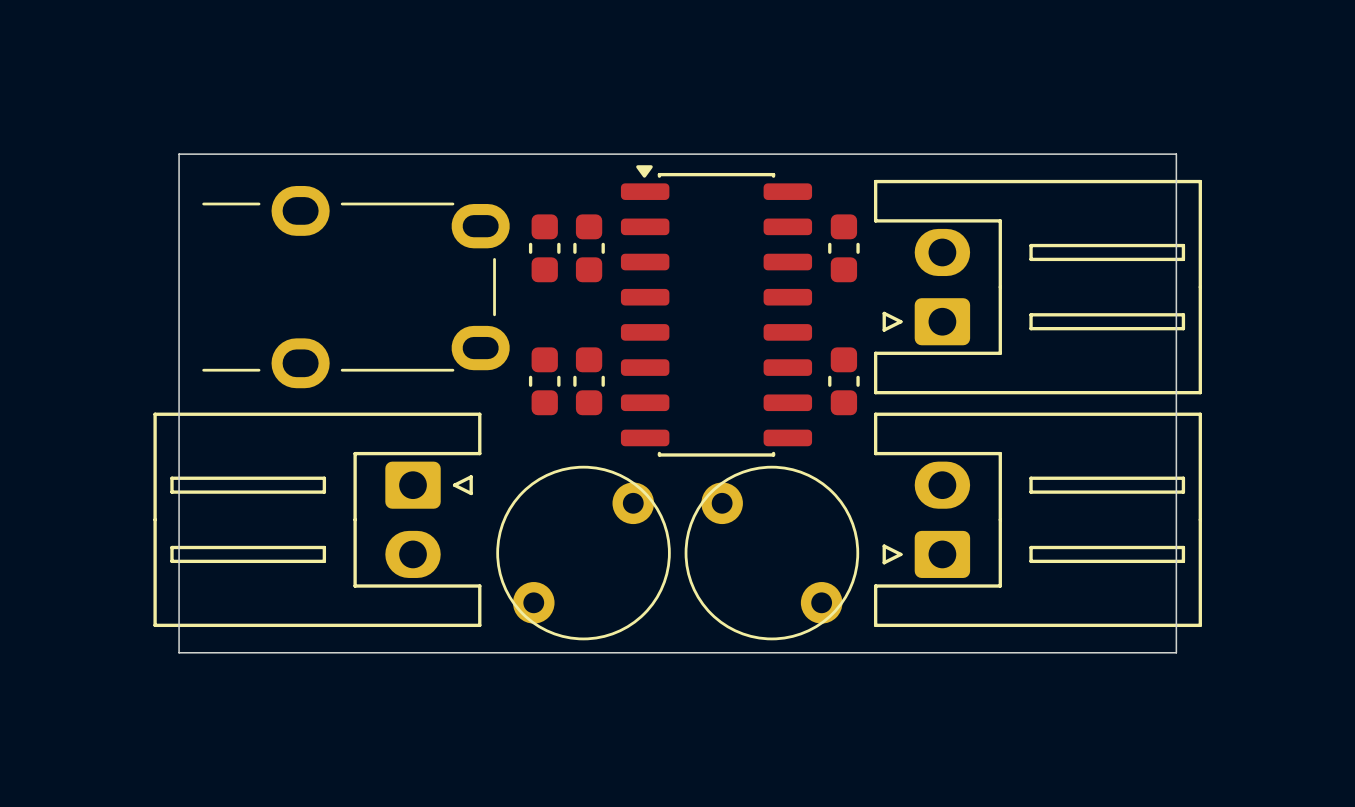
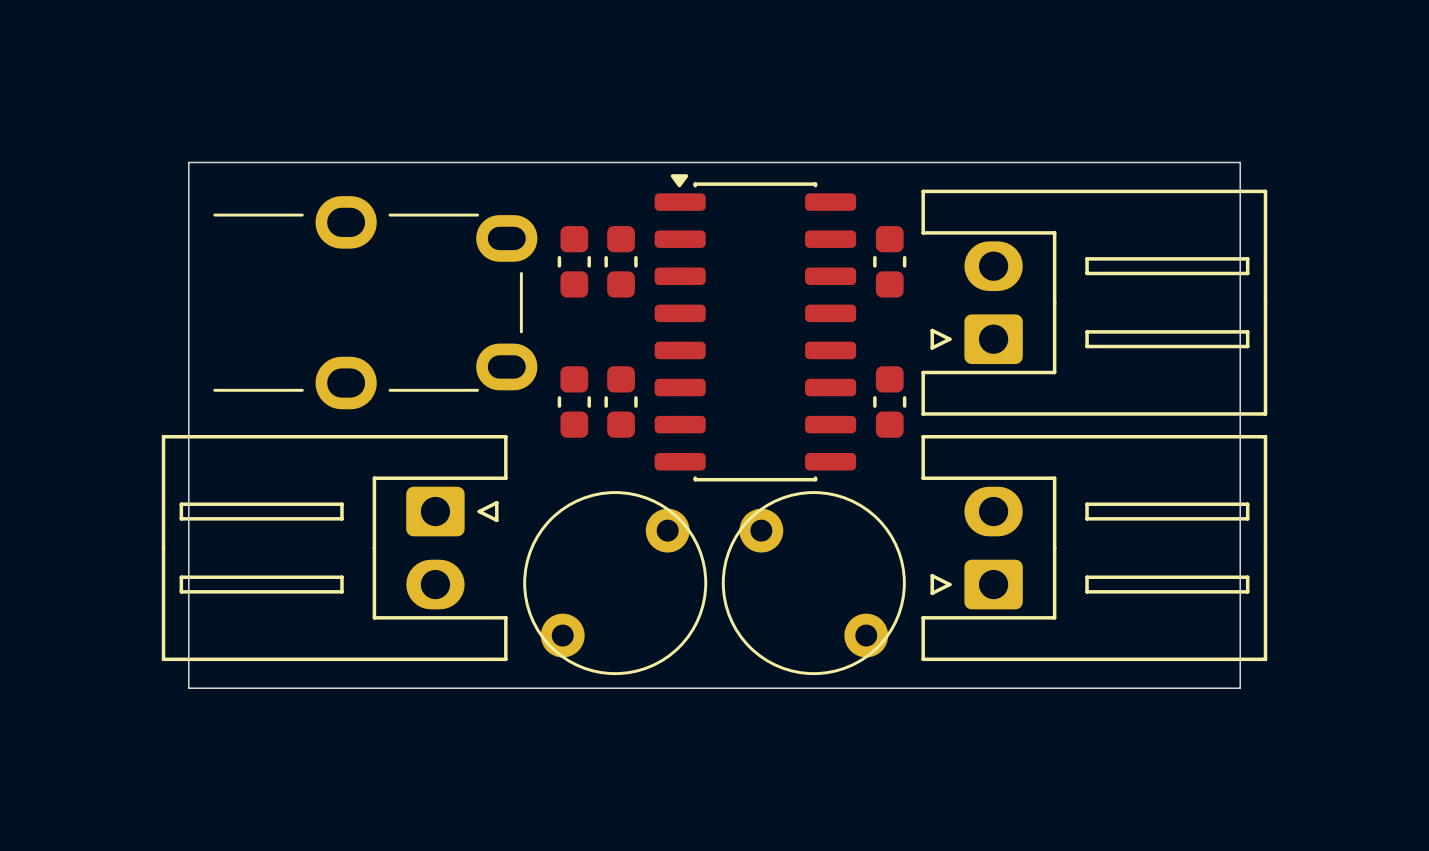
part footprint: [202, 185, 510, 389] -> [213, 196, 538, 410]

